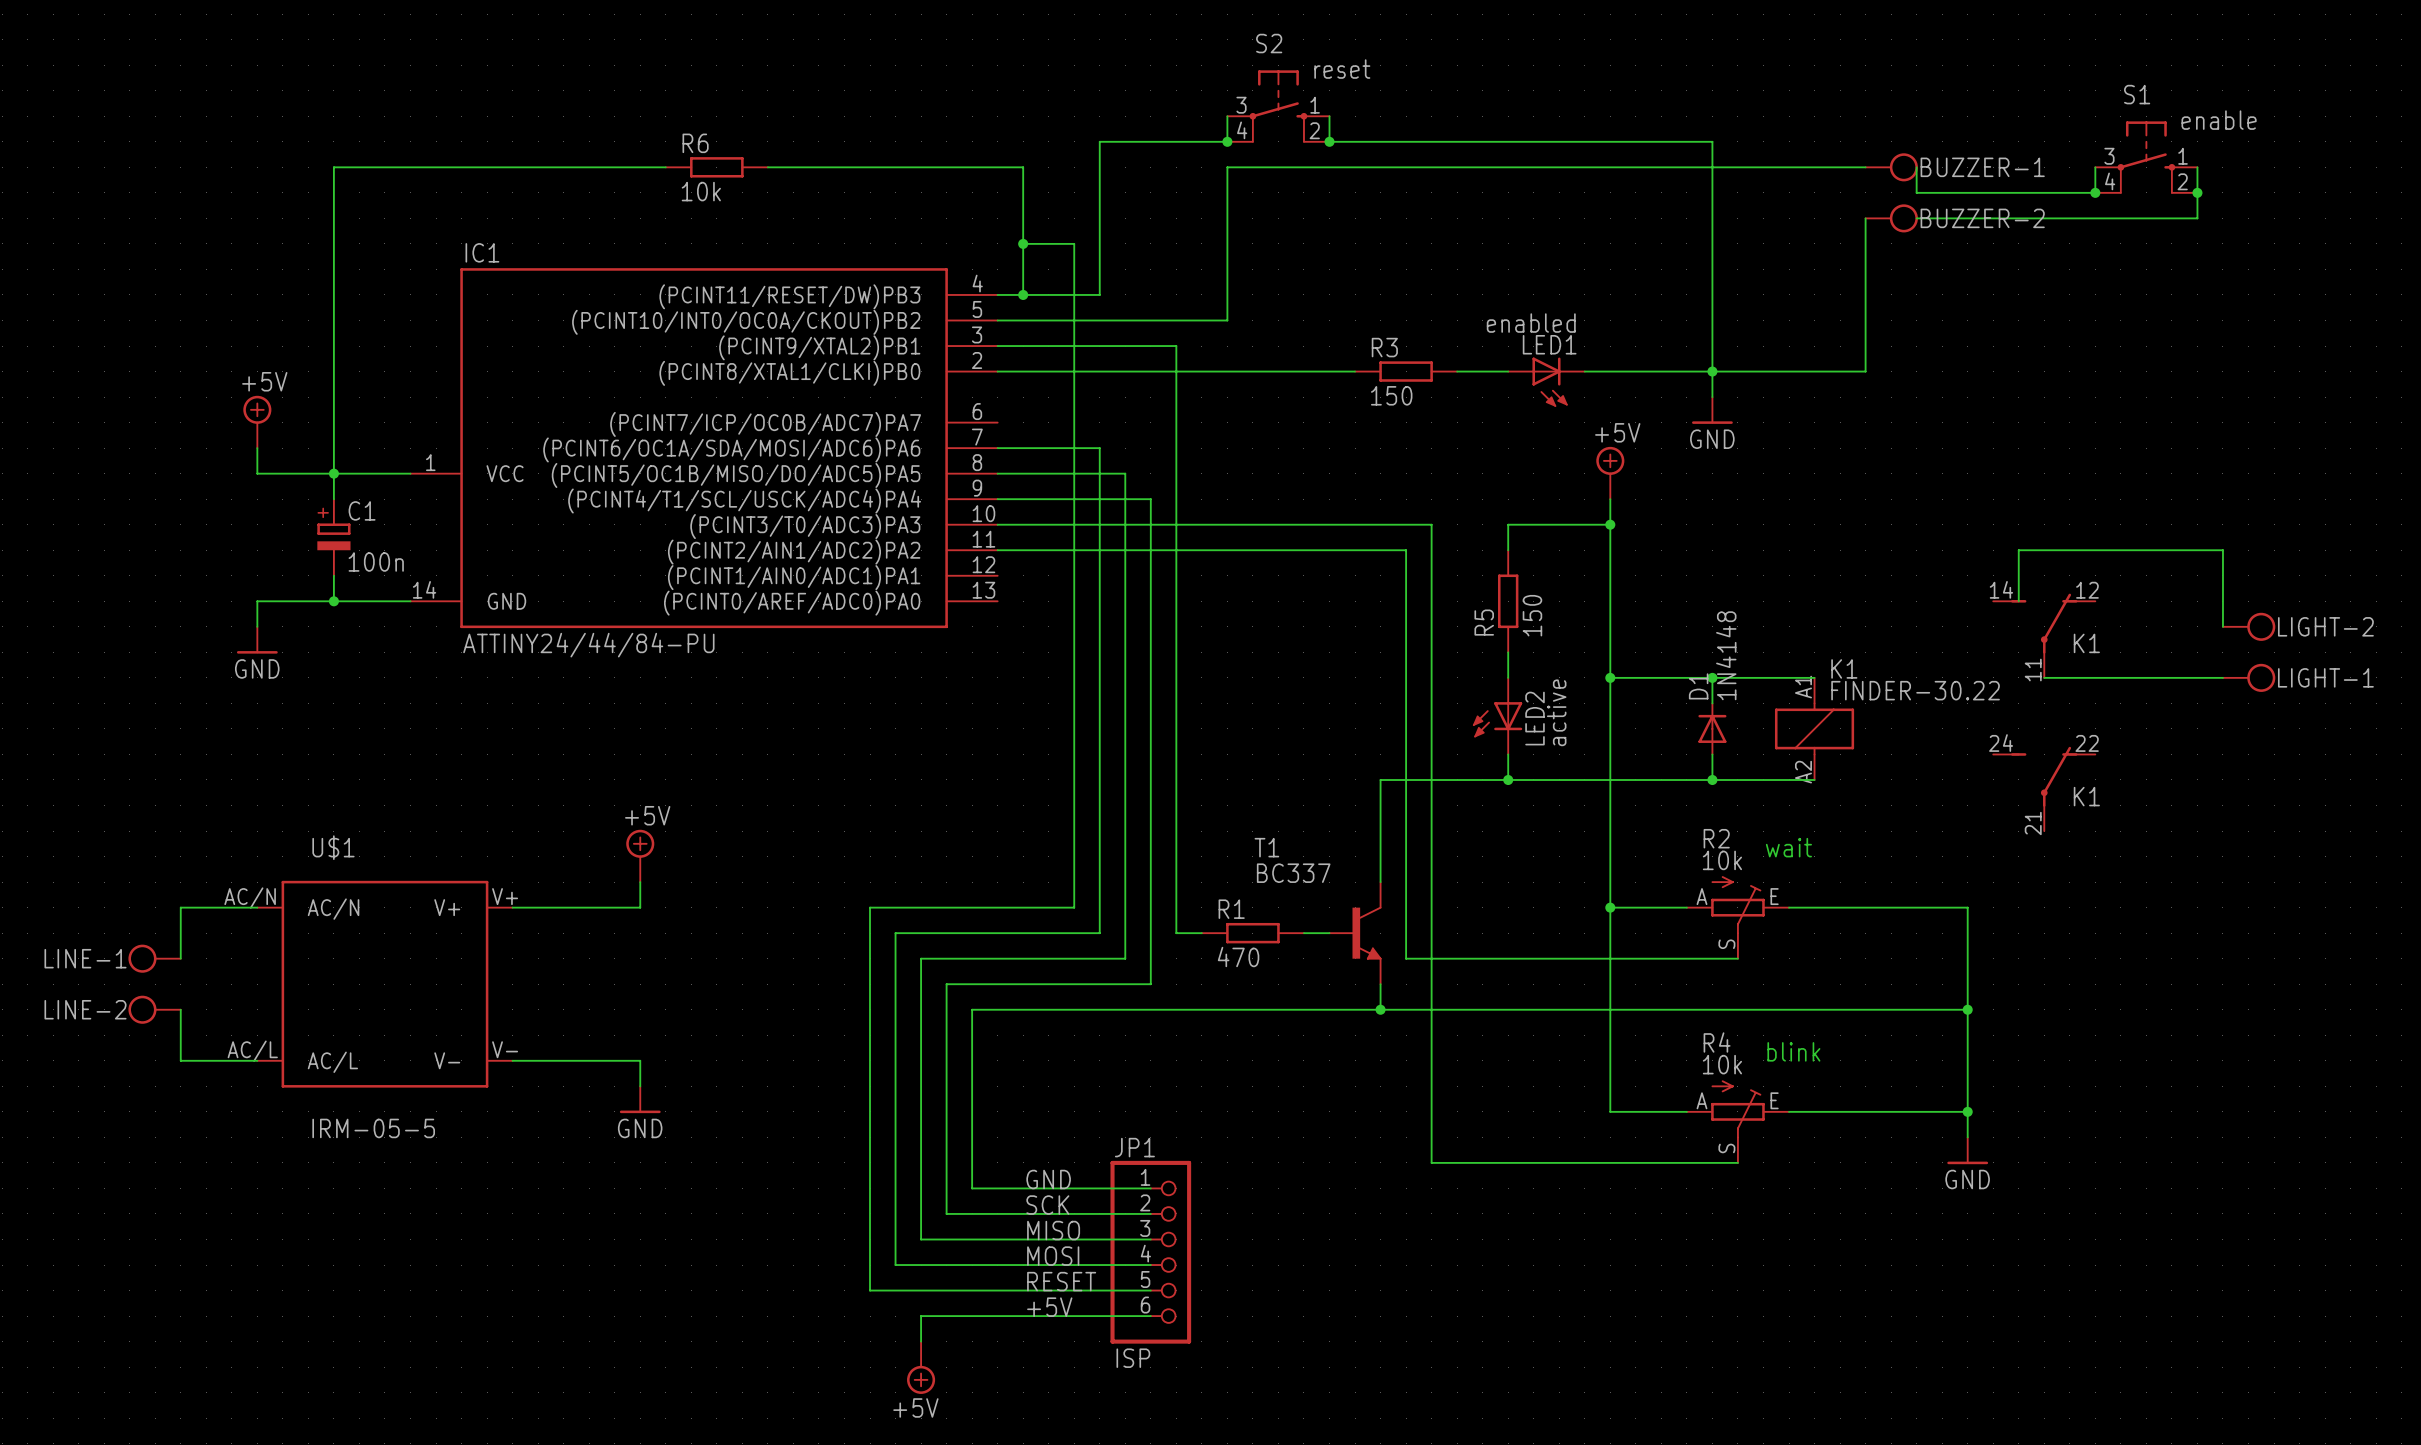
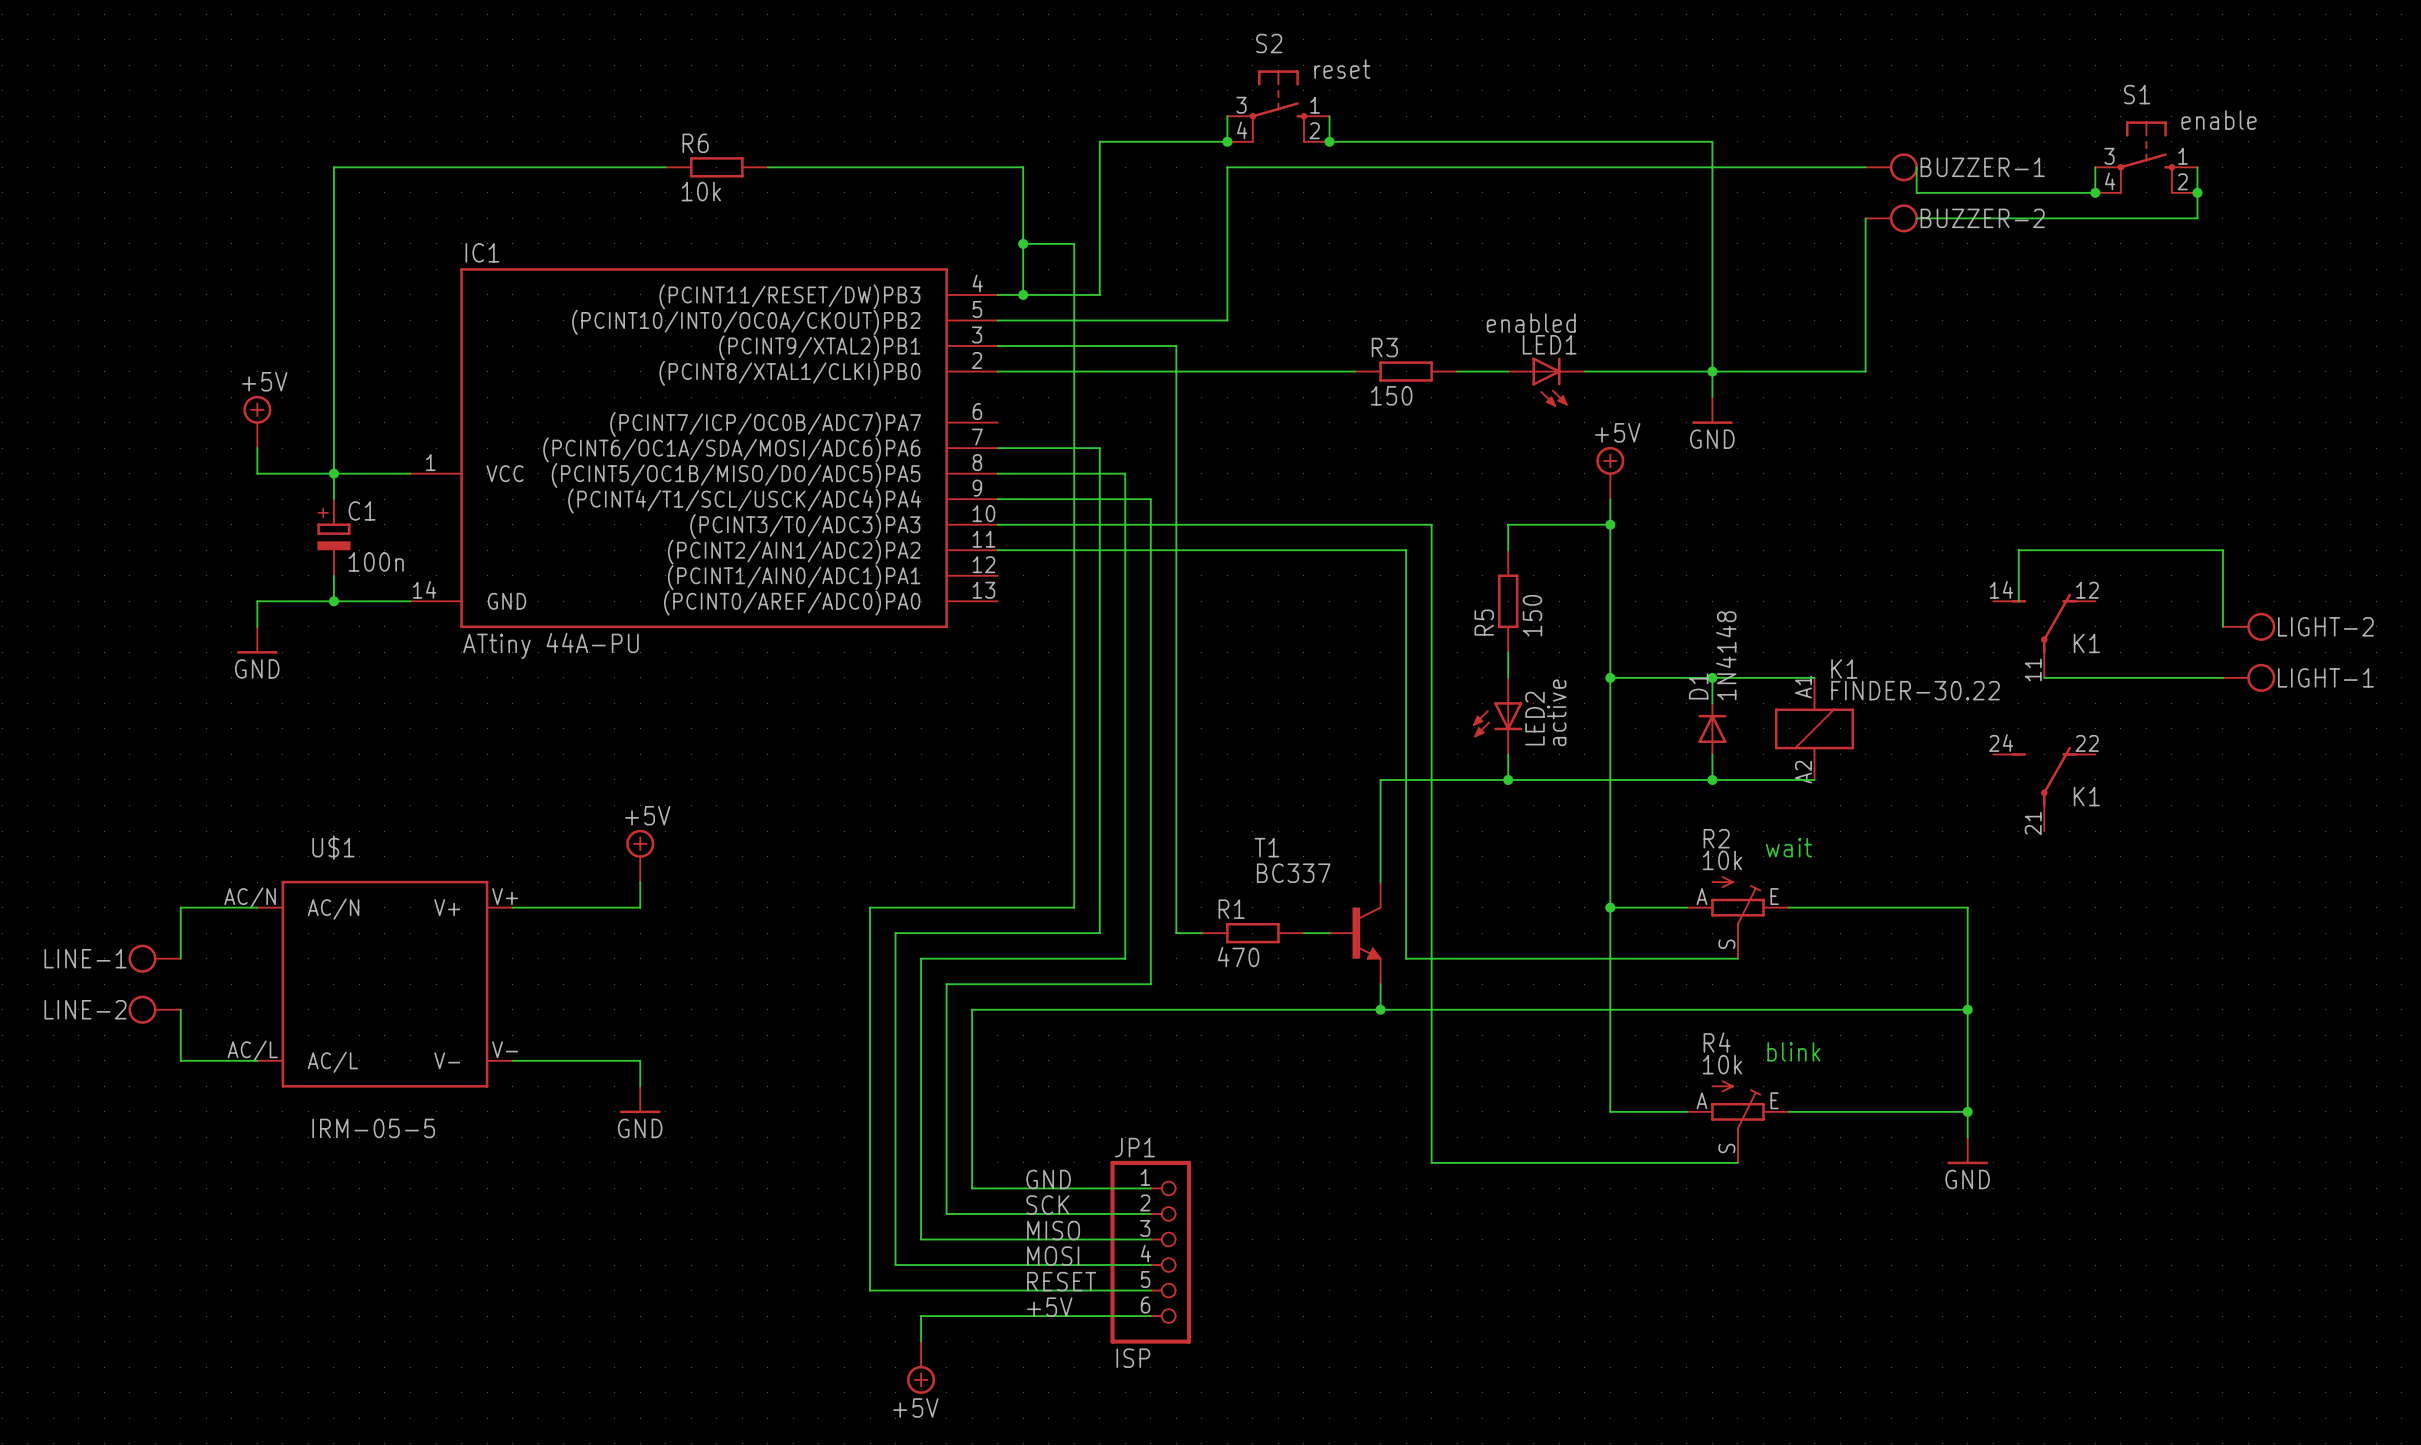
IC1 value: ATTINY24/44/84-PU (588, 645) -> ATtiny 44A-PU (550, 645)

